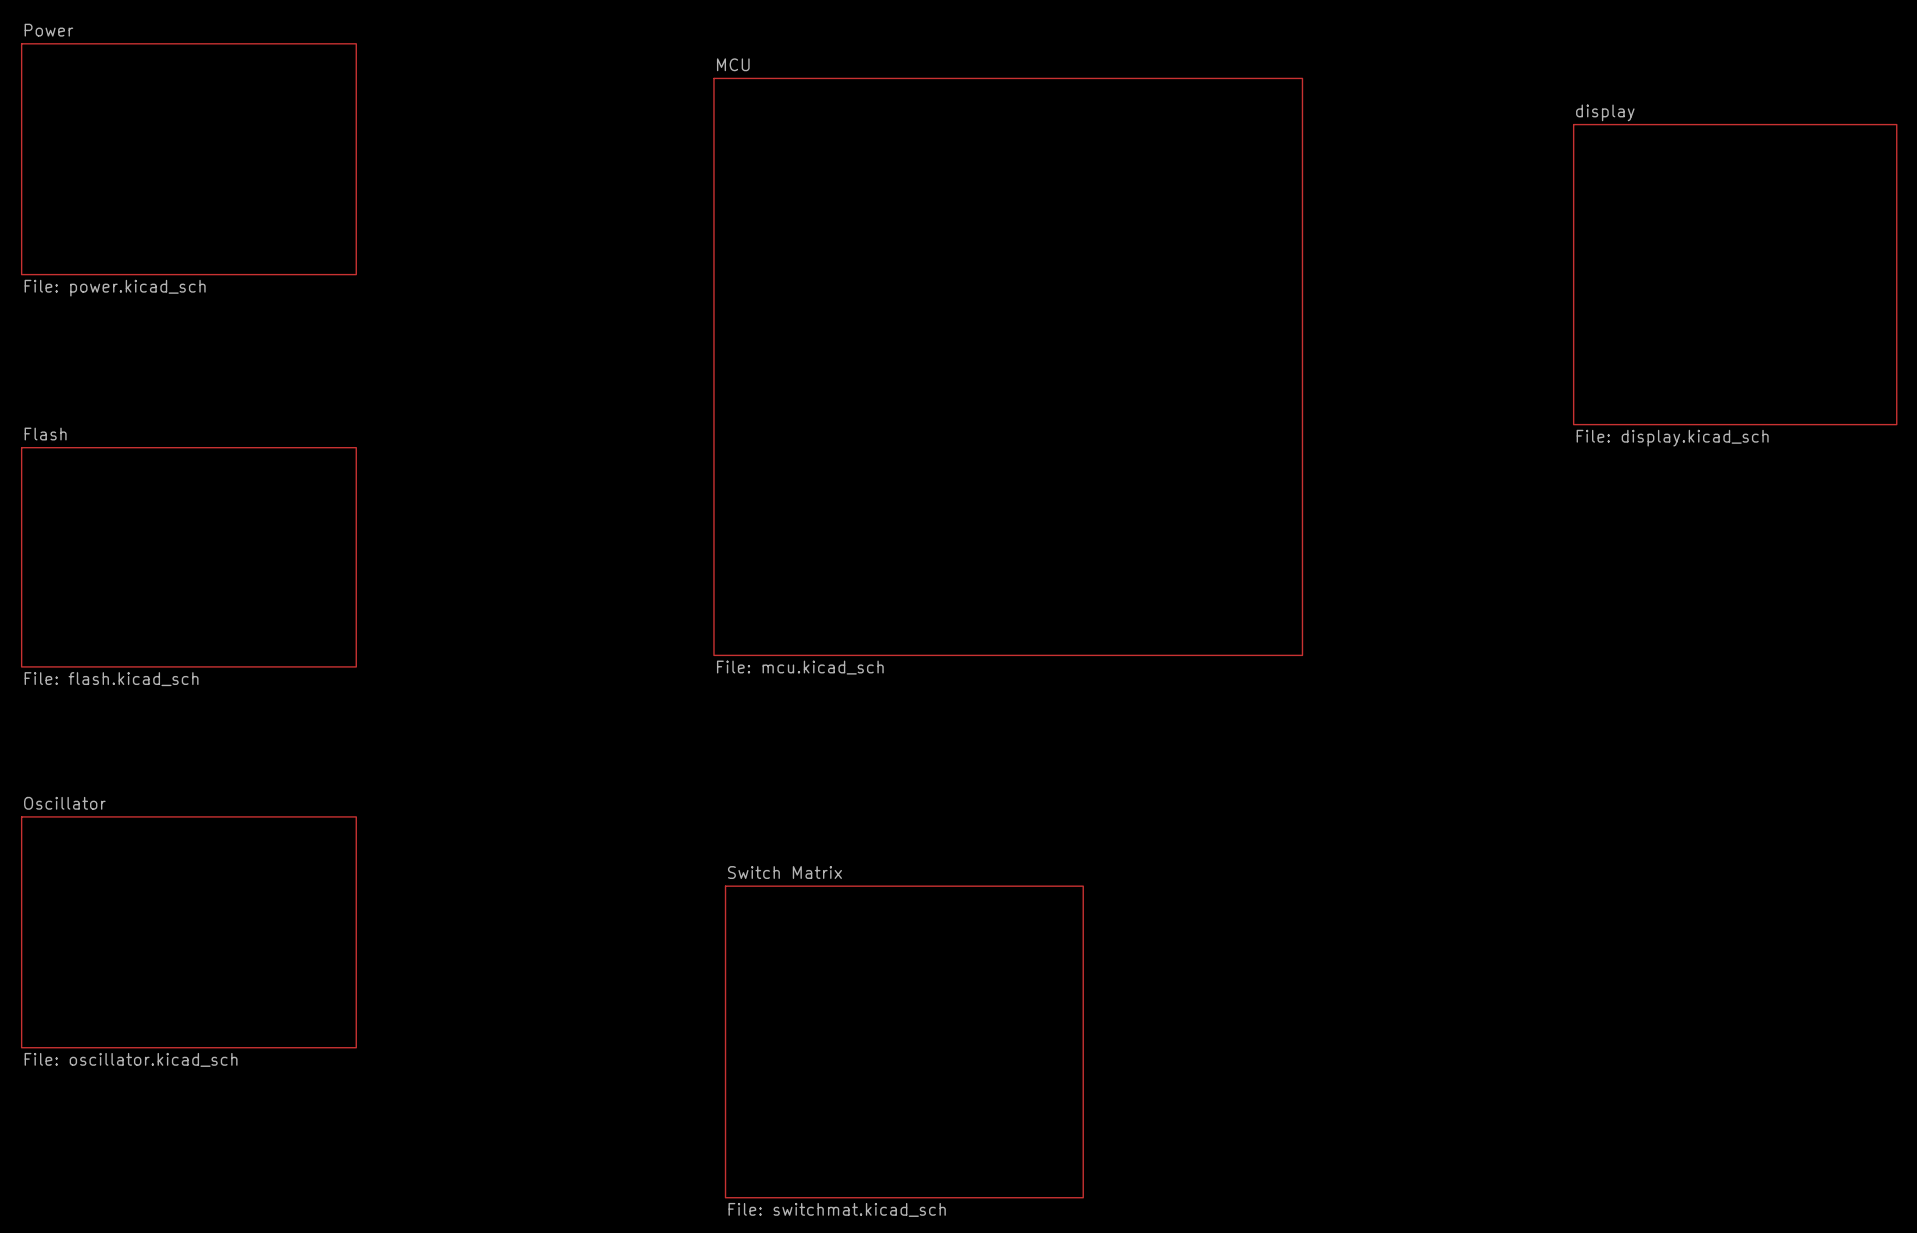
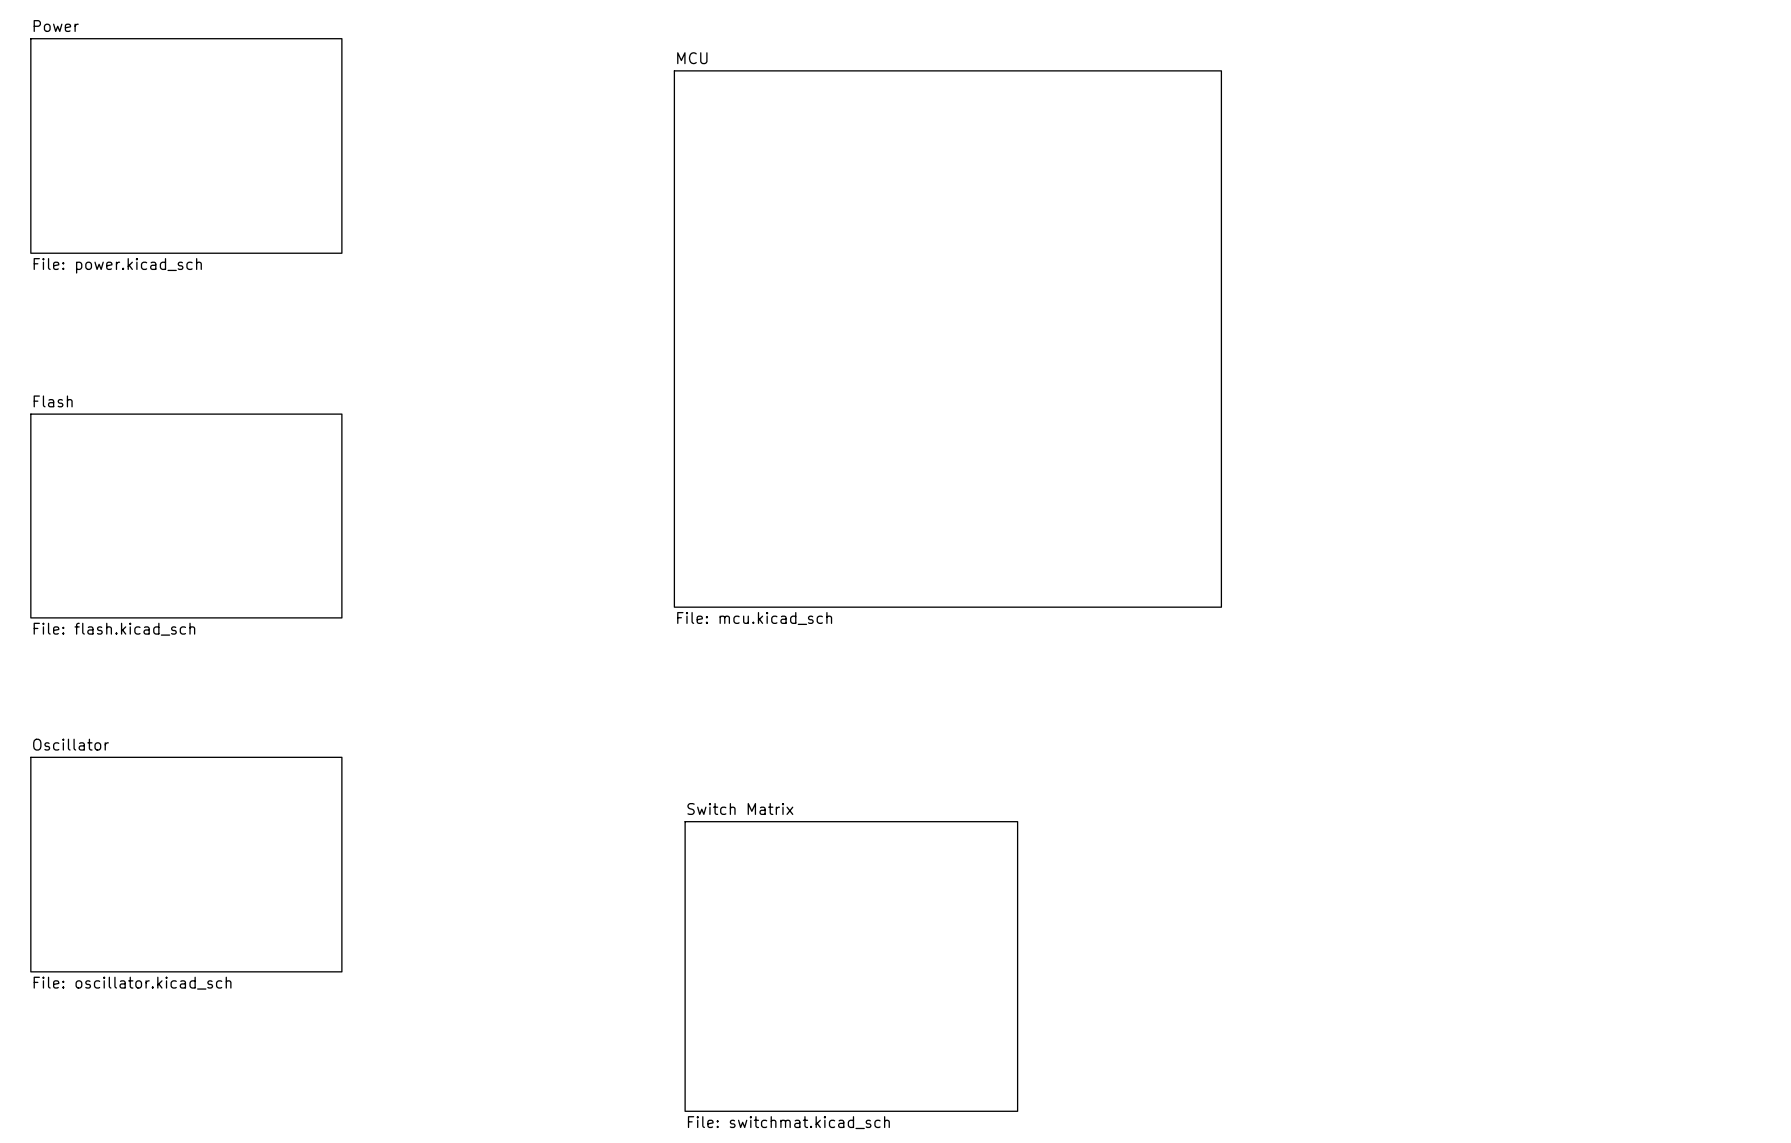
sheet display: File: display.kicad_sch (1735, 274) -> none

